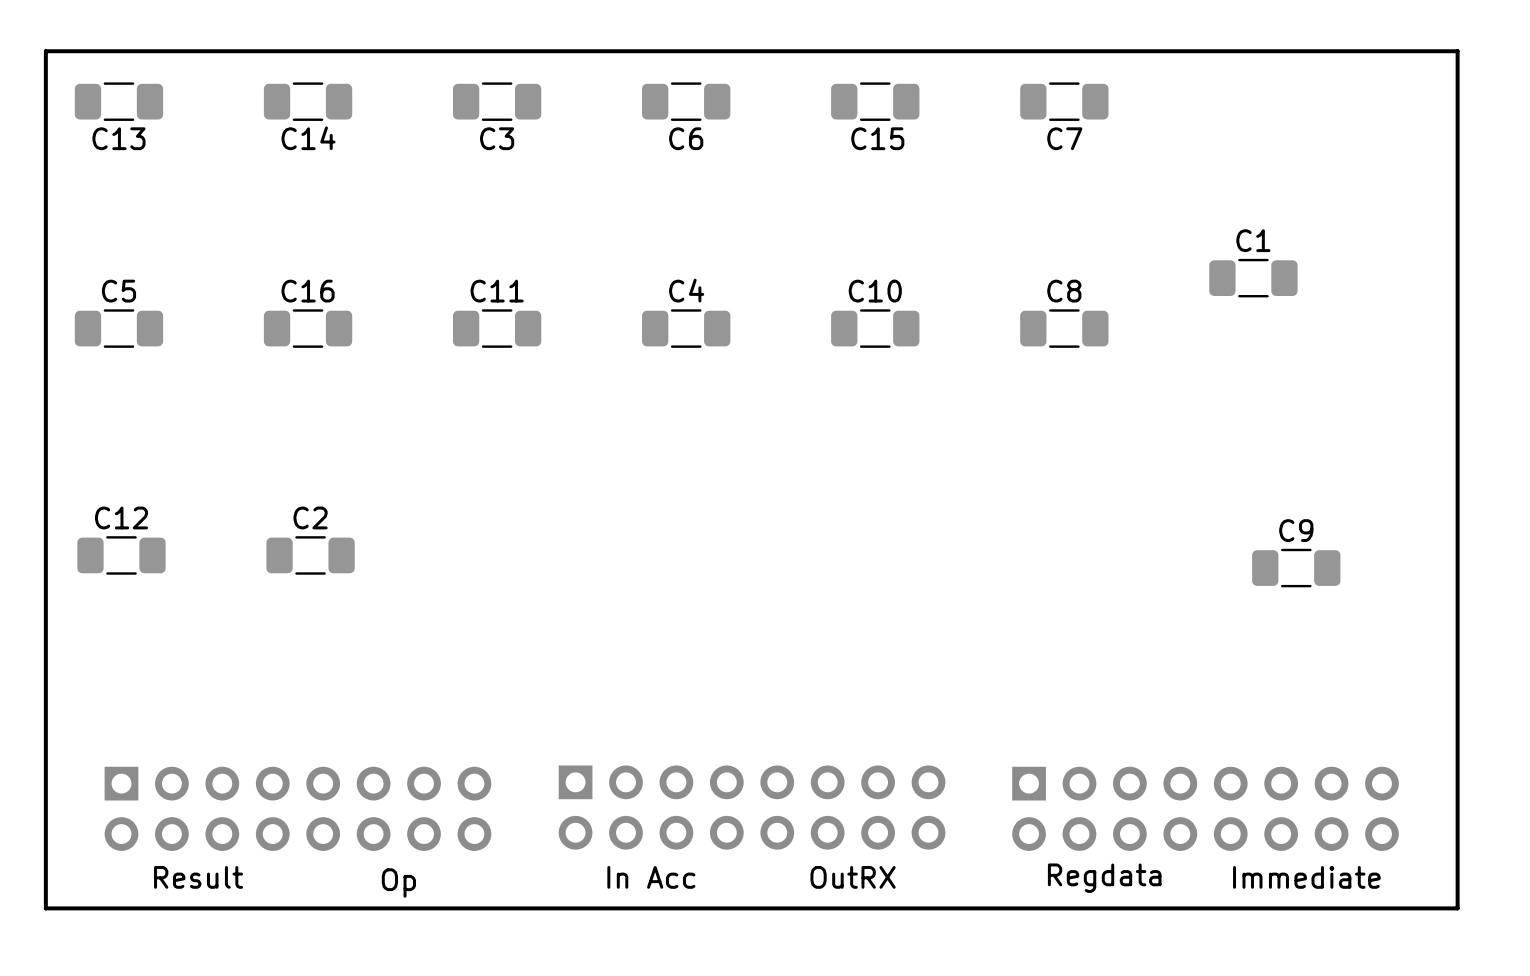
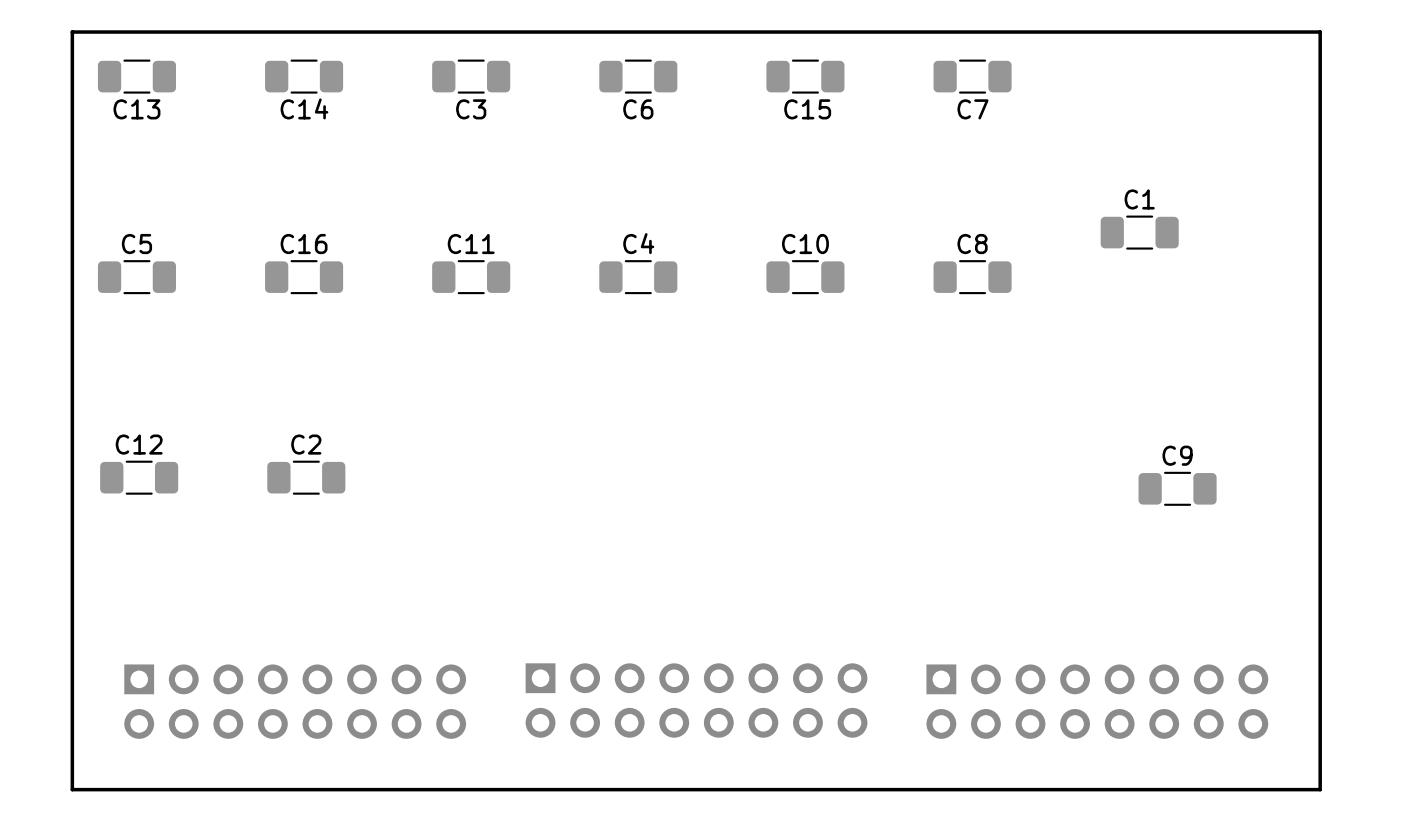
text: Result (198, 877) -> none
text: In Acc (651, 877) -> none
text: OutRX (853, 877) -> none
text: Immediate (1306, 877) -> none
text: Regdata (1104, 878) -> none
text: Op (398, 882) -> none

